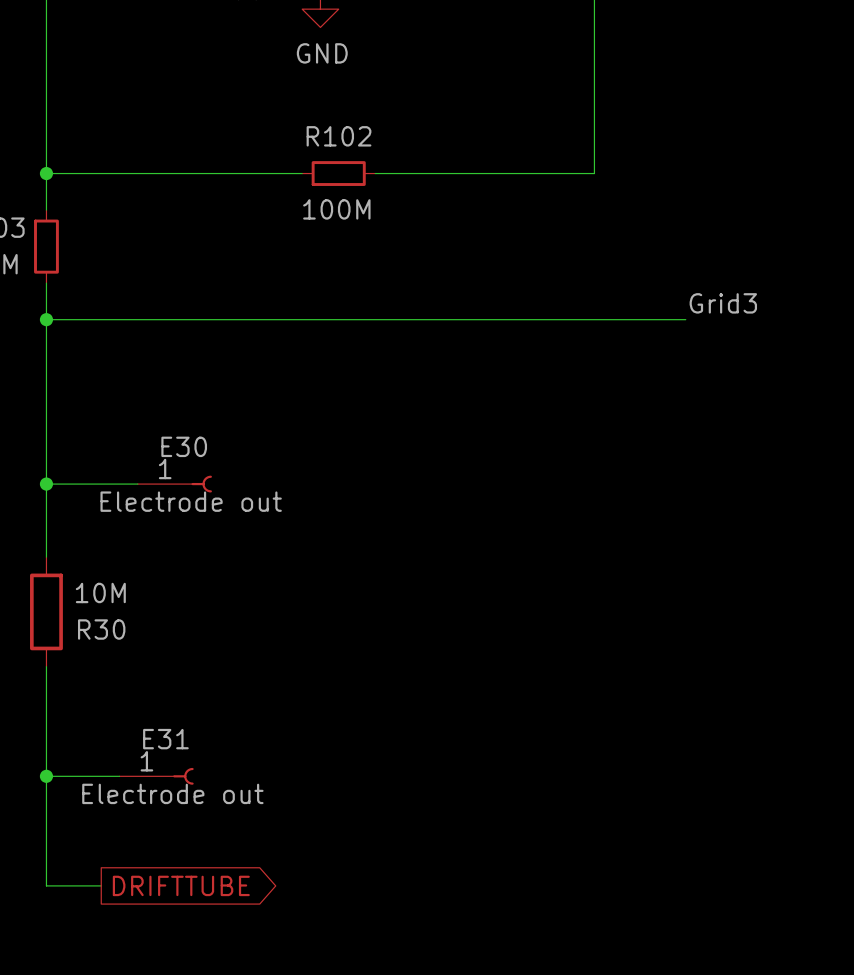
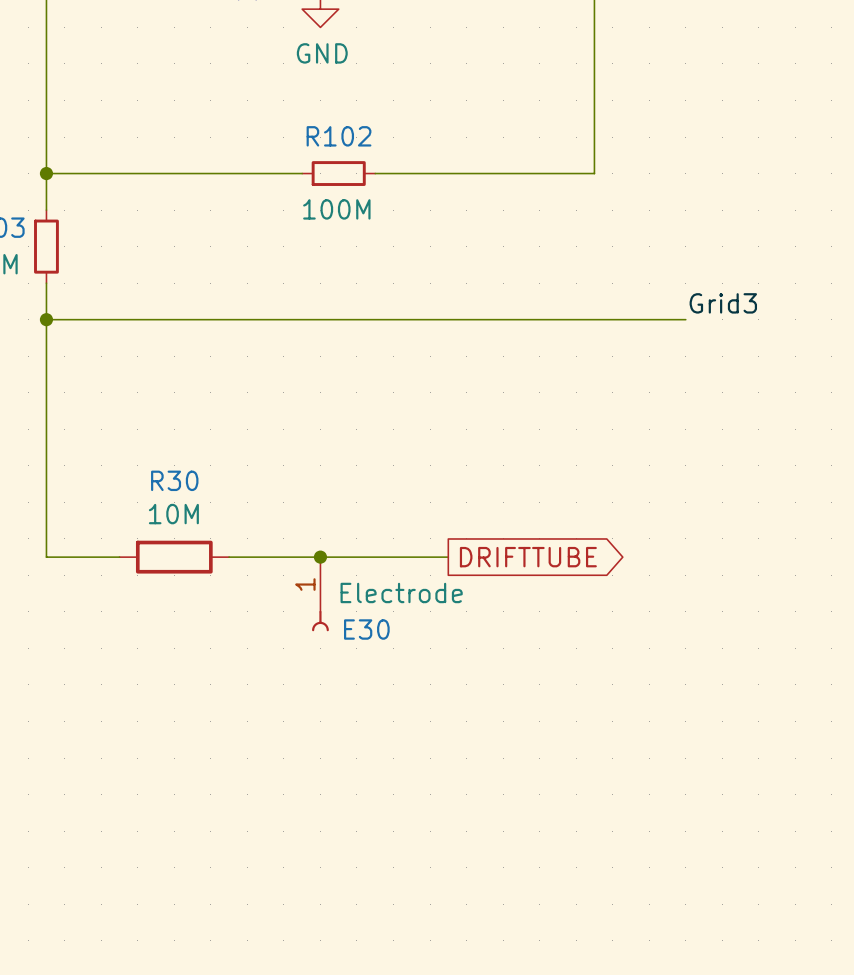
E30 name position: E30 (184, 446) -> E30 (366, 629)
wire: (46, 484) (137, 484) -> none
junction: (46, 484) -> none
E30 position: (174, 484) -> (320, 594)
E30 rotation: 0° (201, 484) -> 90° clockwise (320, 621)
E30 value: Electrode out (191, 501) -> Electrode (401, 592)
wire: none -> (229, 557) (448, 557)
junction: none -> (320, 557)
global label: none -> DRIFTTUBE (528, 557)
R30 value position: 10M (100, 592) -> 10M (173, 514)
R30 rotation: 0° (46, 611) -> 90° clockwise (174, 557)
R30 position: (46, 611) -> (174, 557)
R30 name position: R30 (101, 629) -> R30 (174, 480)
wire: (46, 666) (46, 885) (101, 885) -> none
wire: (46, 776) (119, 776) -> (46, 557) (119, 557)
junction: (46, 776) -> none
E31: Electrode out (156, 776) -> none
global label: DRIFTTUBE (181, 885) -> none

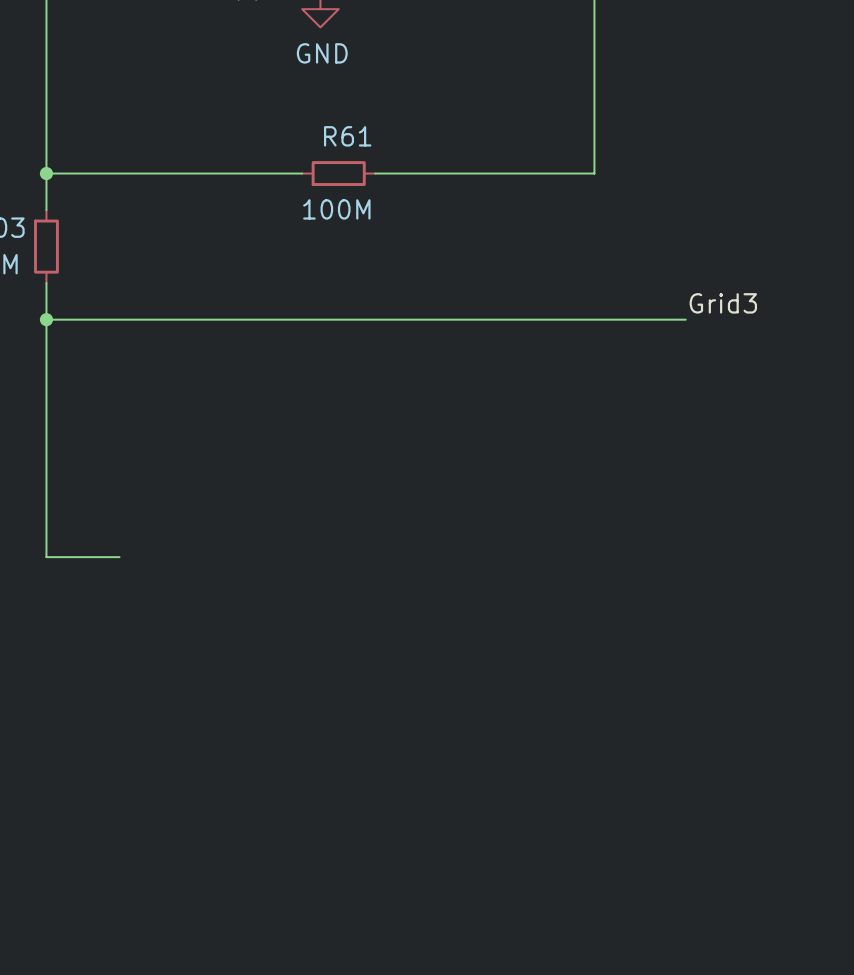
R102 name: R102 (339, 136) -> R61 (347, 136)
R30: 10M (174, 557) -> none
wire: (229, 557) (448, 557) -> none
junction: (320, 557) -> none
global label: DRIFTTUBE (528, 557) -> none
E30: Electrode (320, 594) -> none

